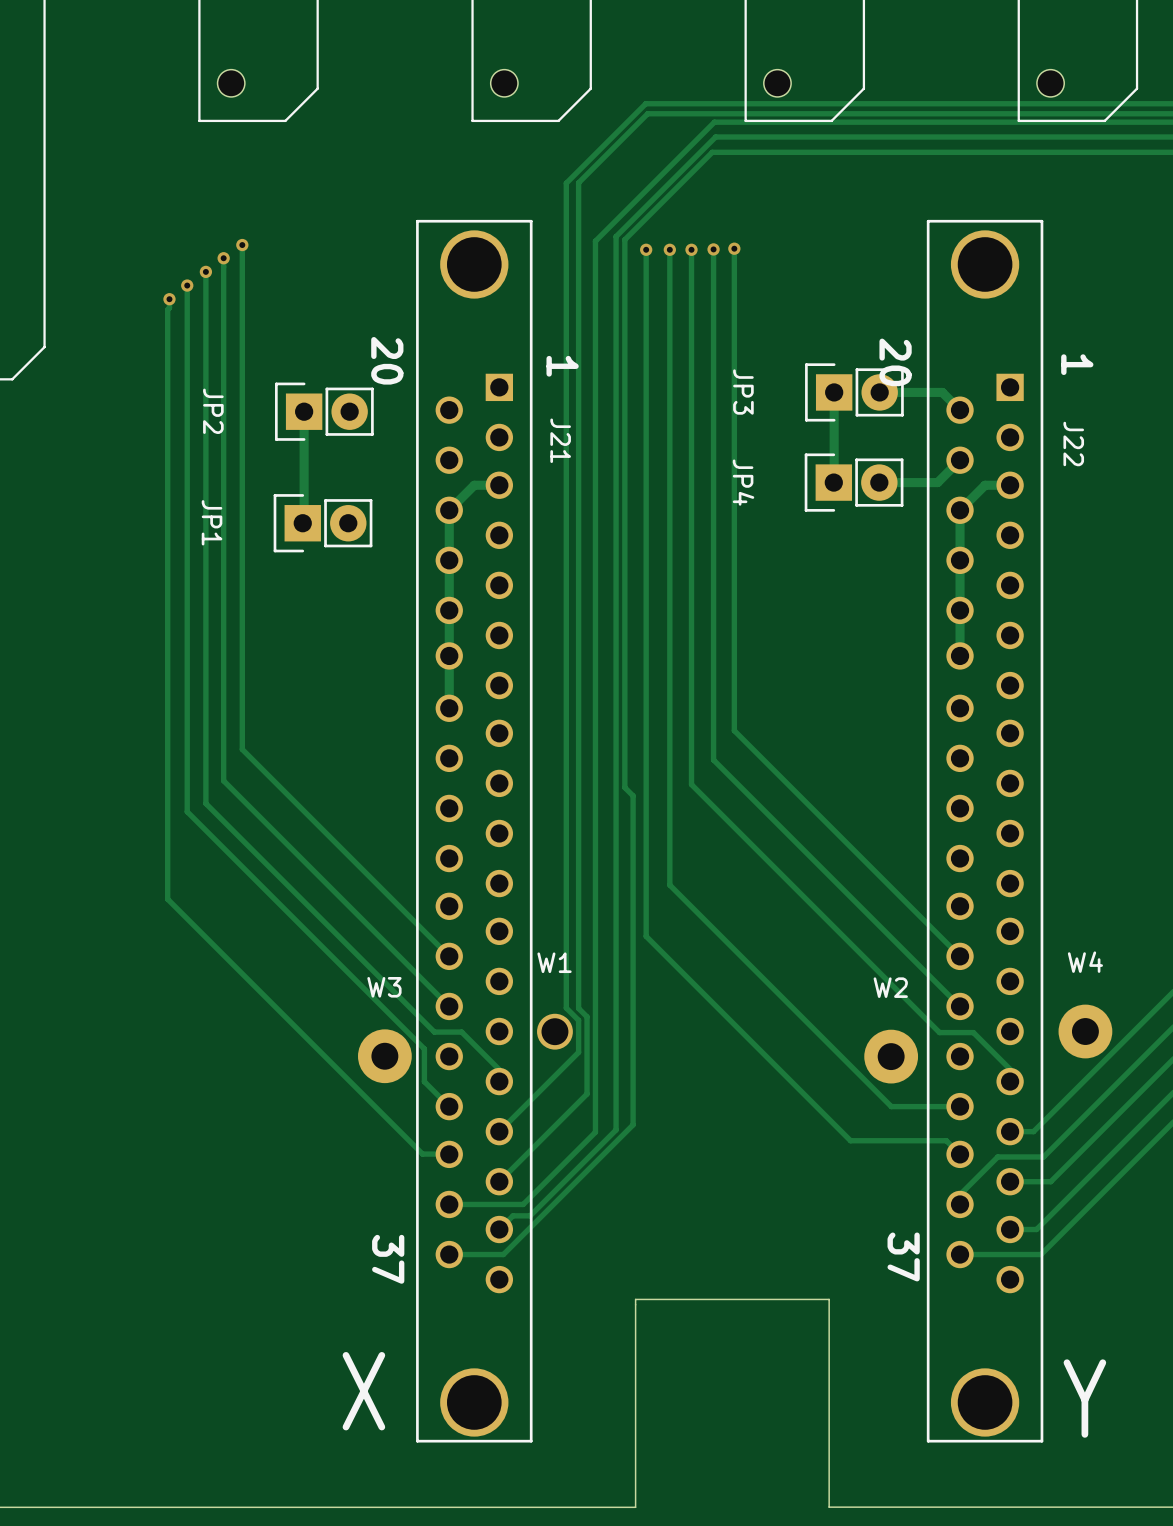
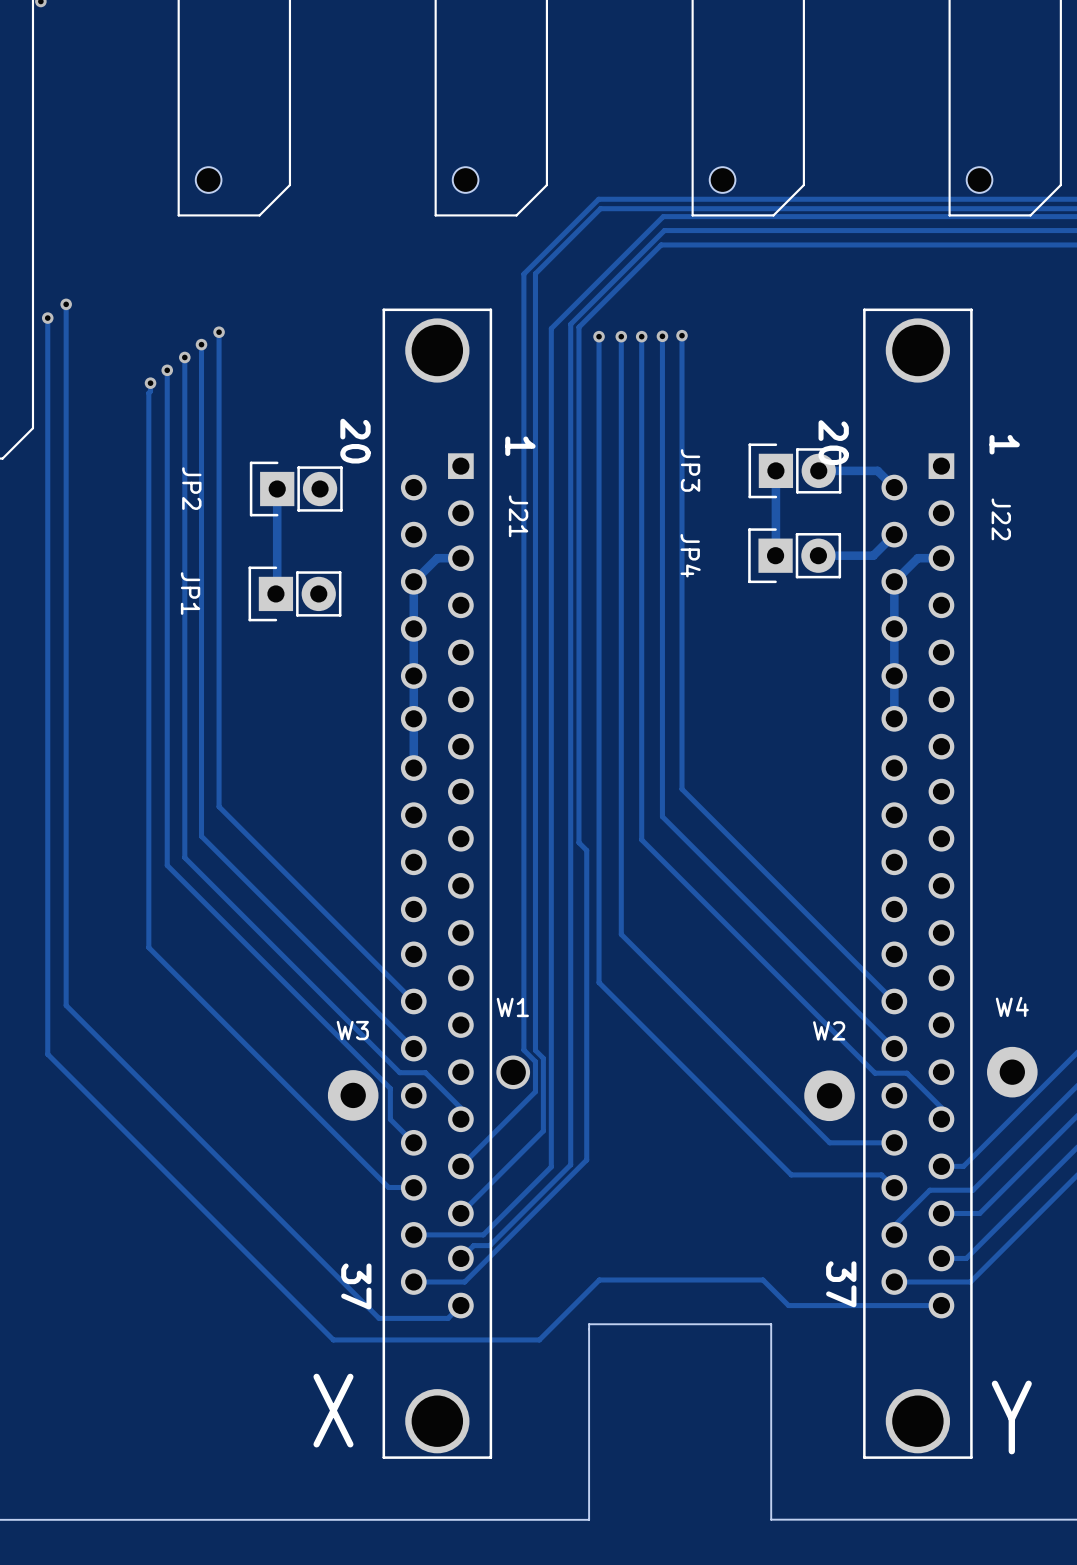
track: none -> (66, 304) (66, 1005) (379, 1318) (448, 1318) (460, 1305)
via: none -> (66, 304)
track: none -> (47, 318) (47, 1054) (333, 1339) (539, 1339) (599, 1279) (762, 1279) (788, 1305) (941, 1305)
via: none -> (47, 318)

